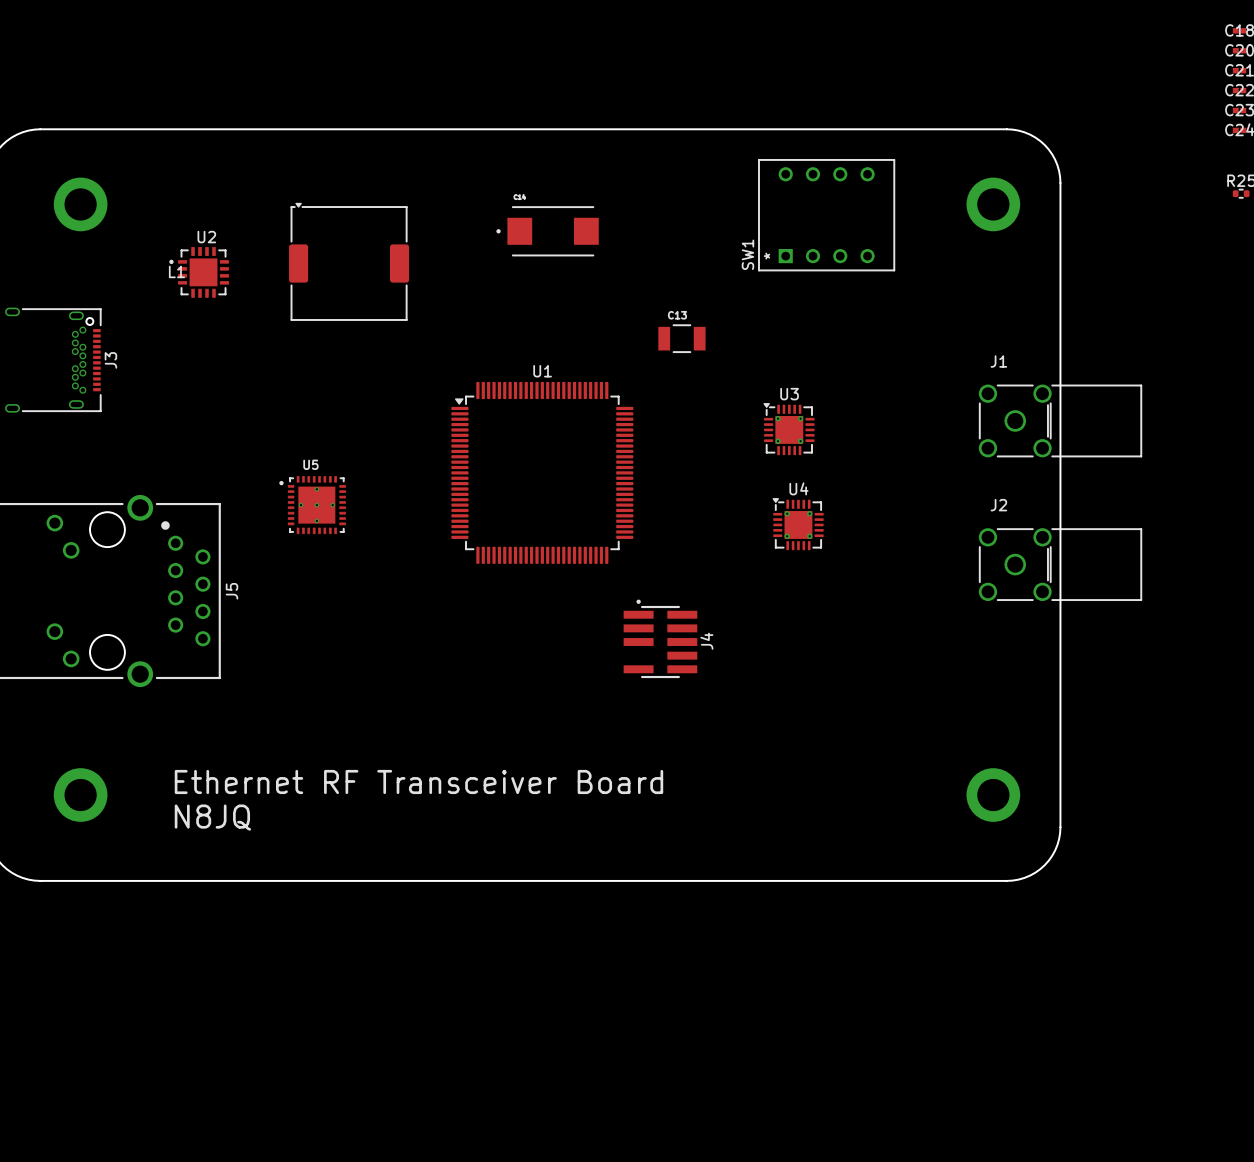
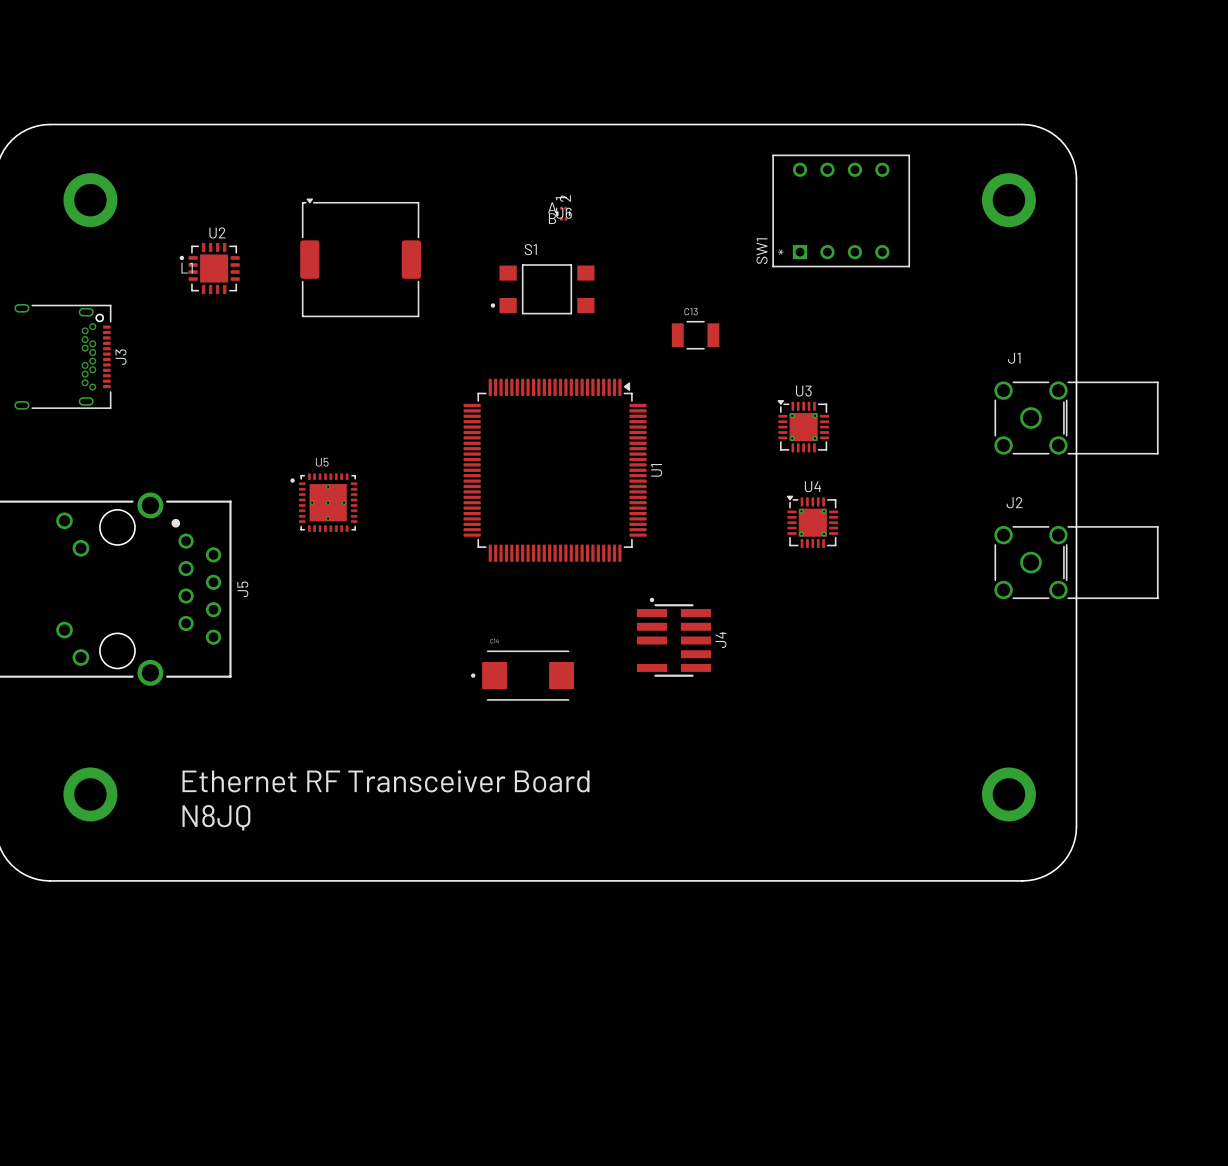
U6: none -> (563, 213)
part position: (547, 231) -> (522, 675)
S1: none -> (542, 289)
U1 rotation: 0° (542, 472) -> 90° clockwise (555, 470)

